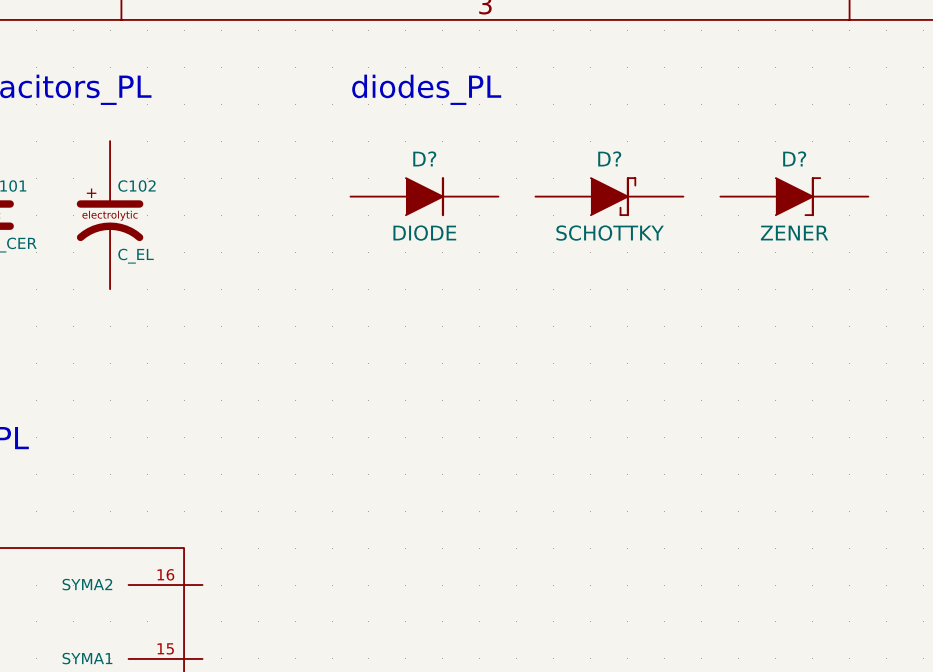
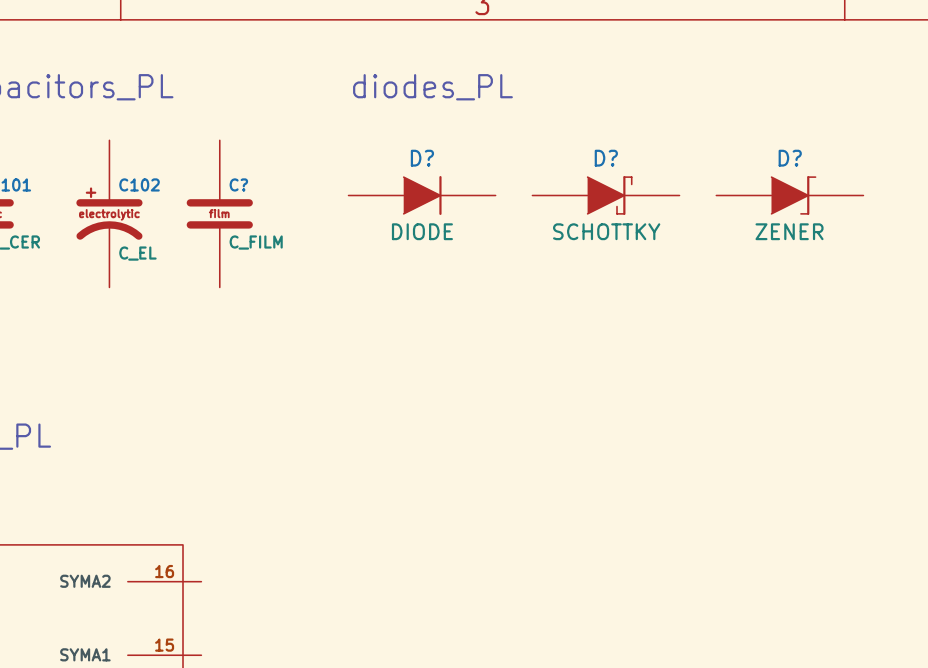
C?: none -> C_FILM (219, 213)

